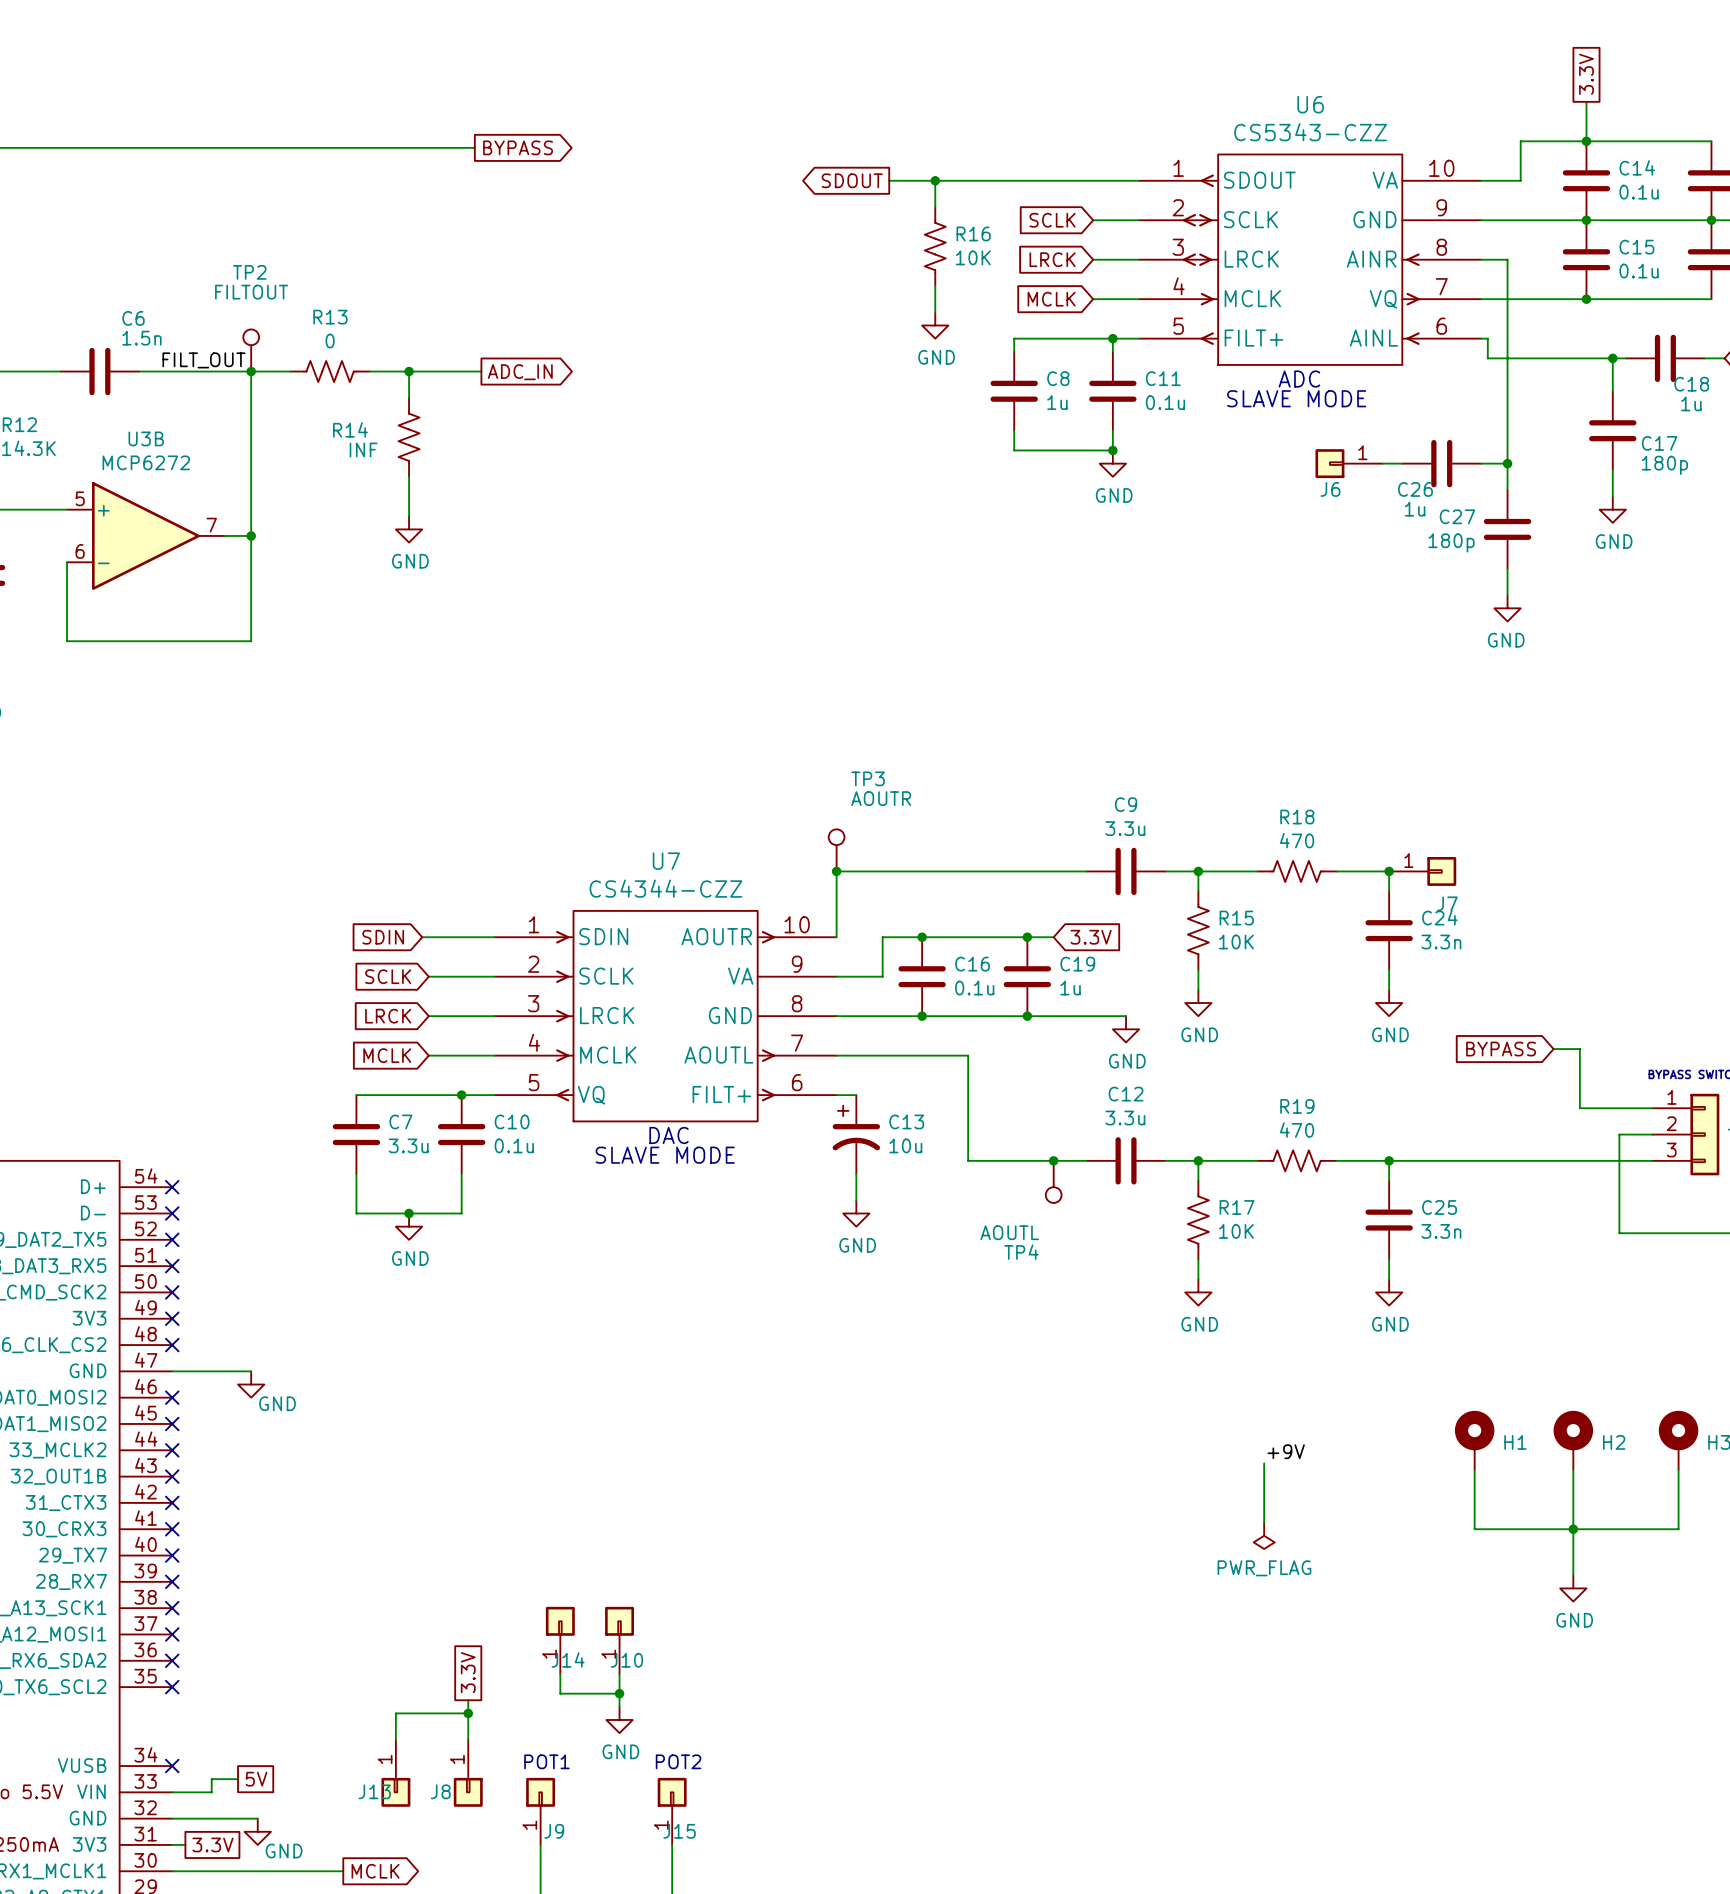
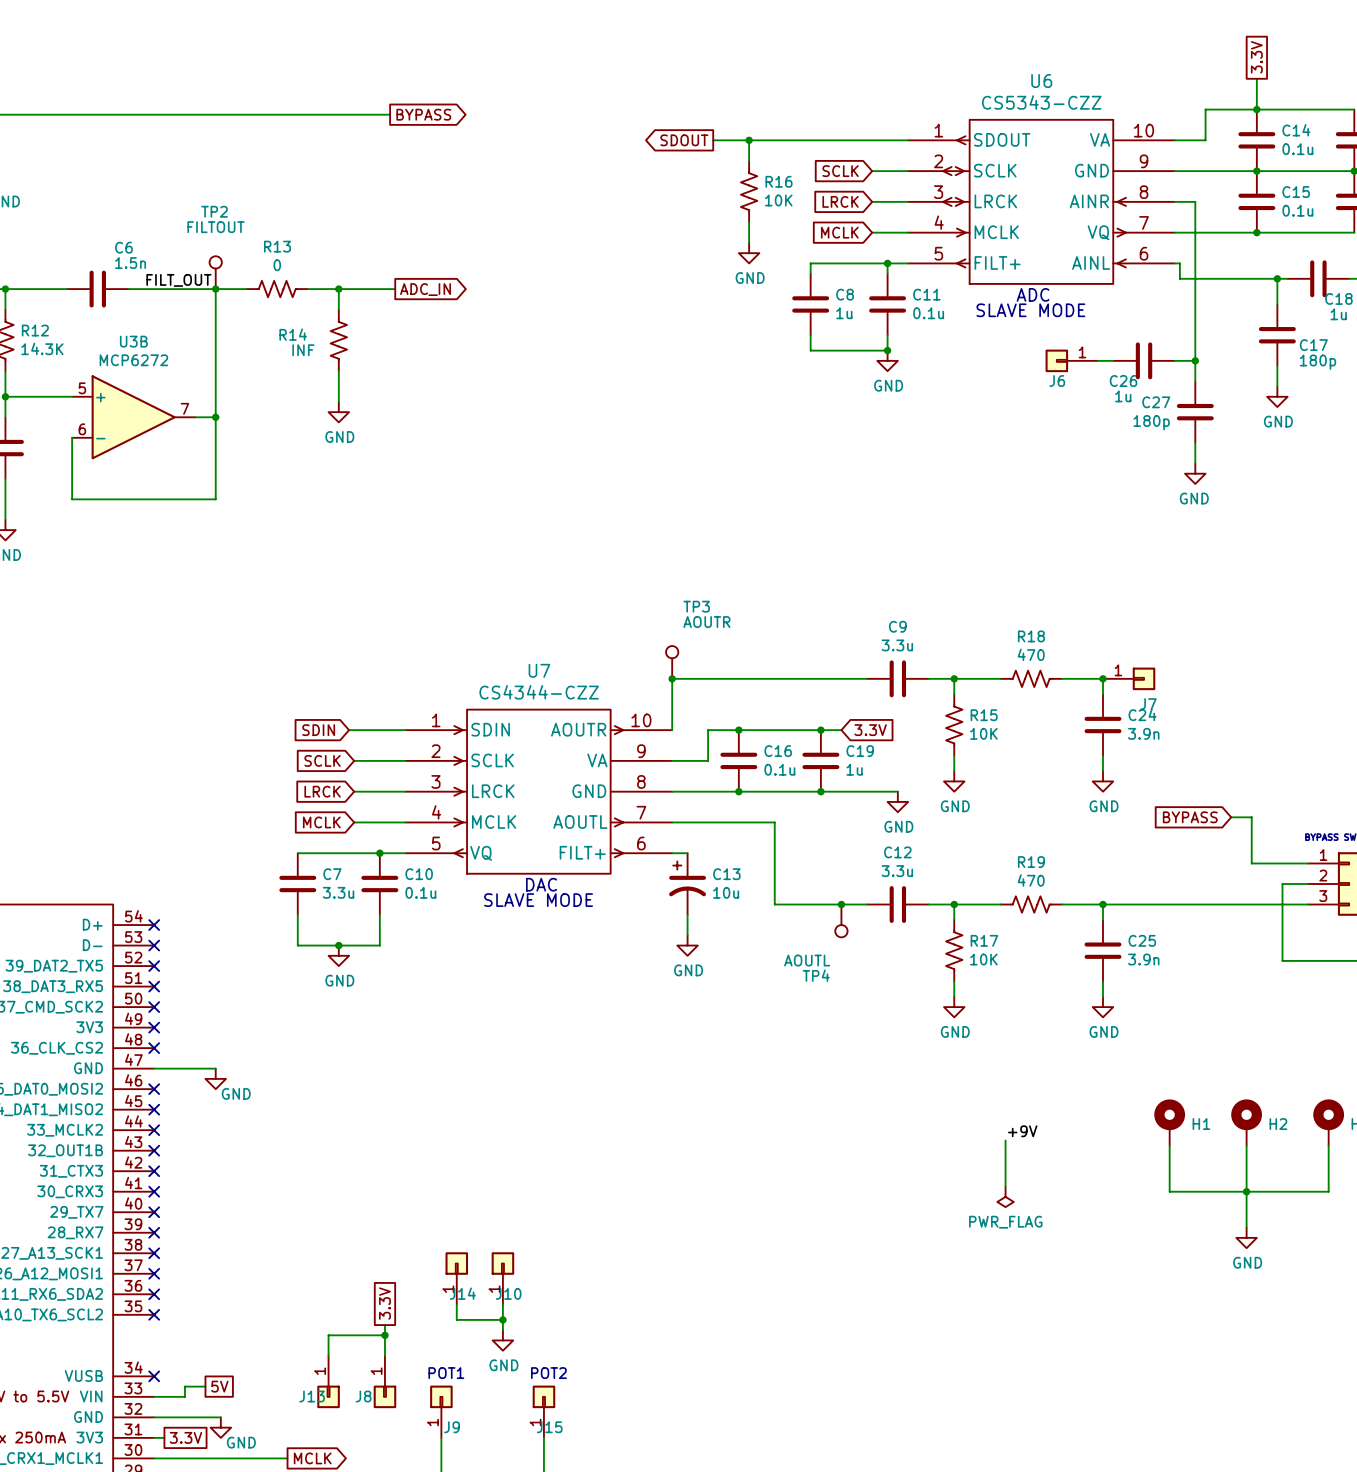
C24 value: 3.3n (1441, 942) -> 3.9n (1143, 733)
C25 value: 3.3n (1441, 1231) -> 3.9n (1143, 959)

